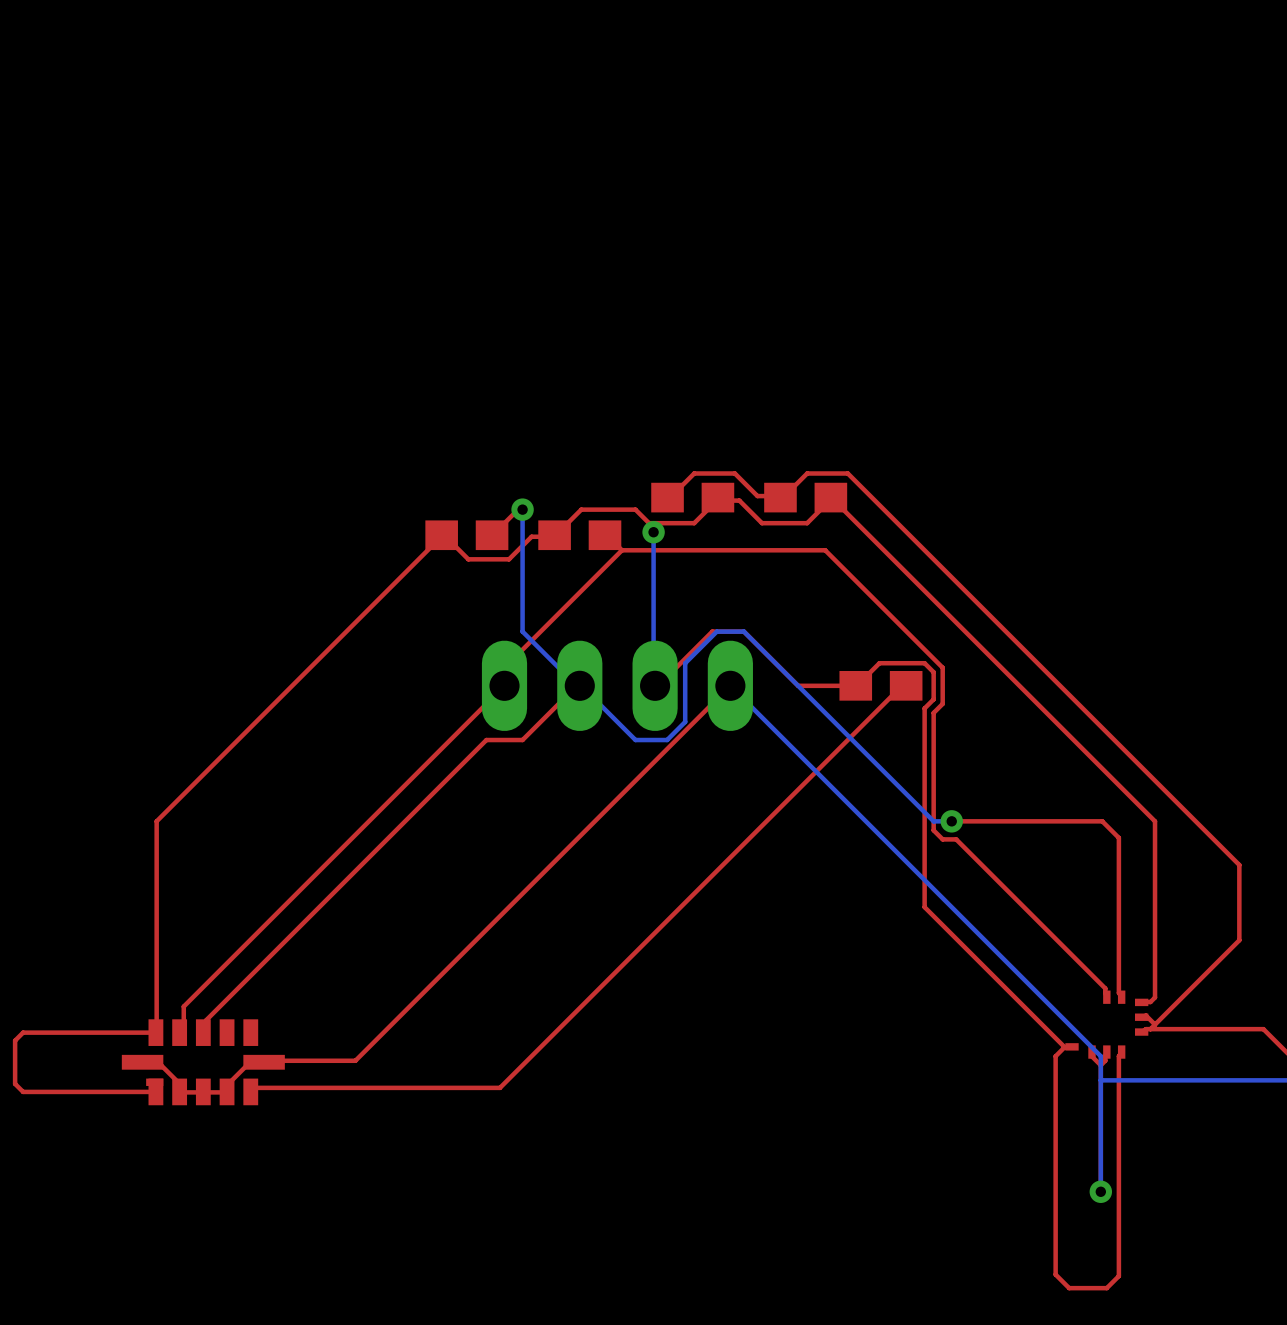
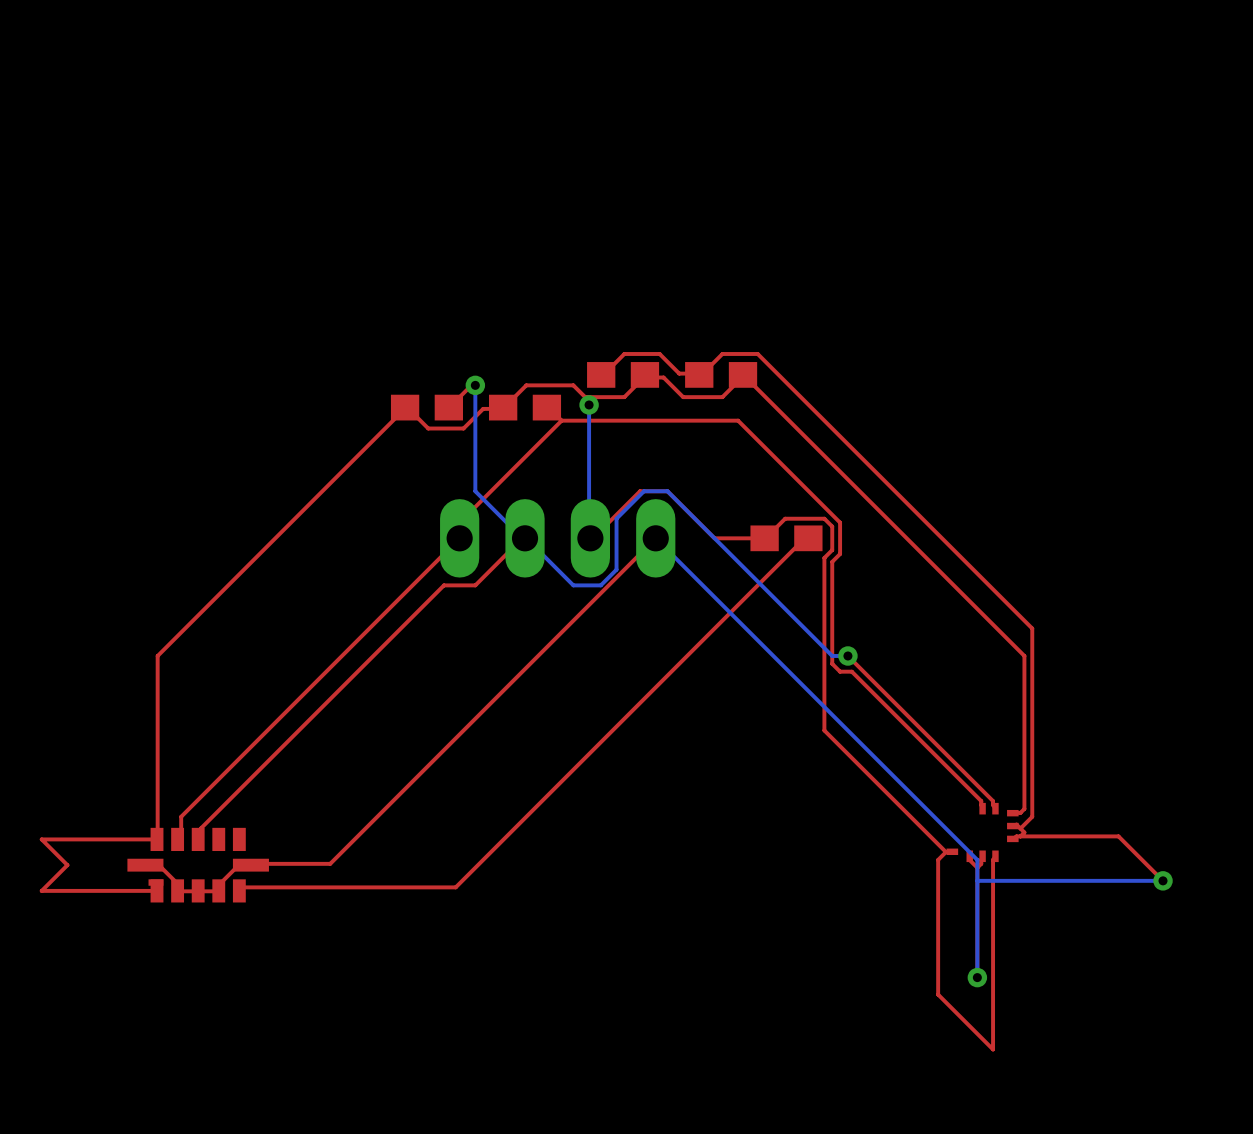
top track: (1164, 789) (1239, 865) (1239, 940) (1155, 1024) -> (1032, 628) (1032, 816) (1020, 828)
top track: (951, 821) (1102, 821) (1118, 837) (1118, 988) -> (847, 655) (993, 801)
top track: (23, 1032) (15, 1040) (15, 1083) (23, 1091) -> (41, 839) (67, 865) (41, 890)
top track: (1055, 1211) (1055, 1274) (1069, 1288) (1106, 1288) (1118, 1274) -> (938, 994) (993, 1049)

